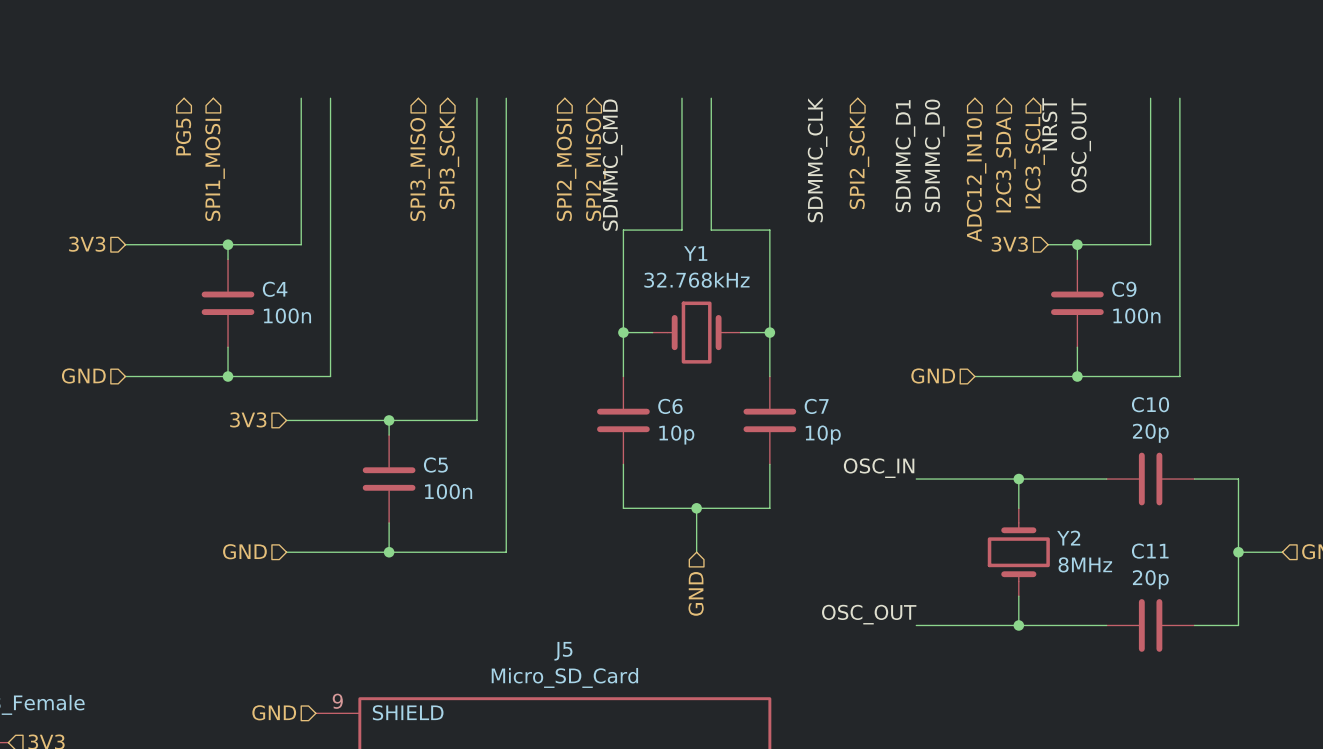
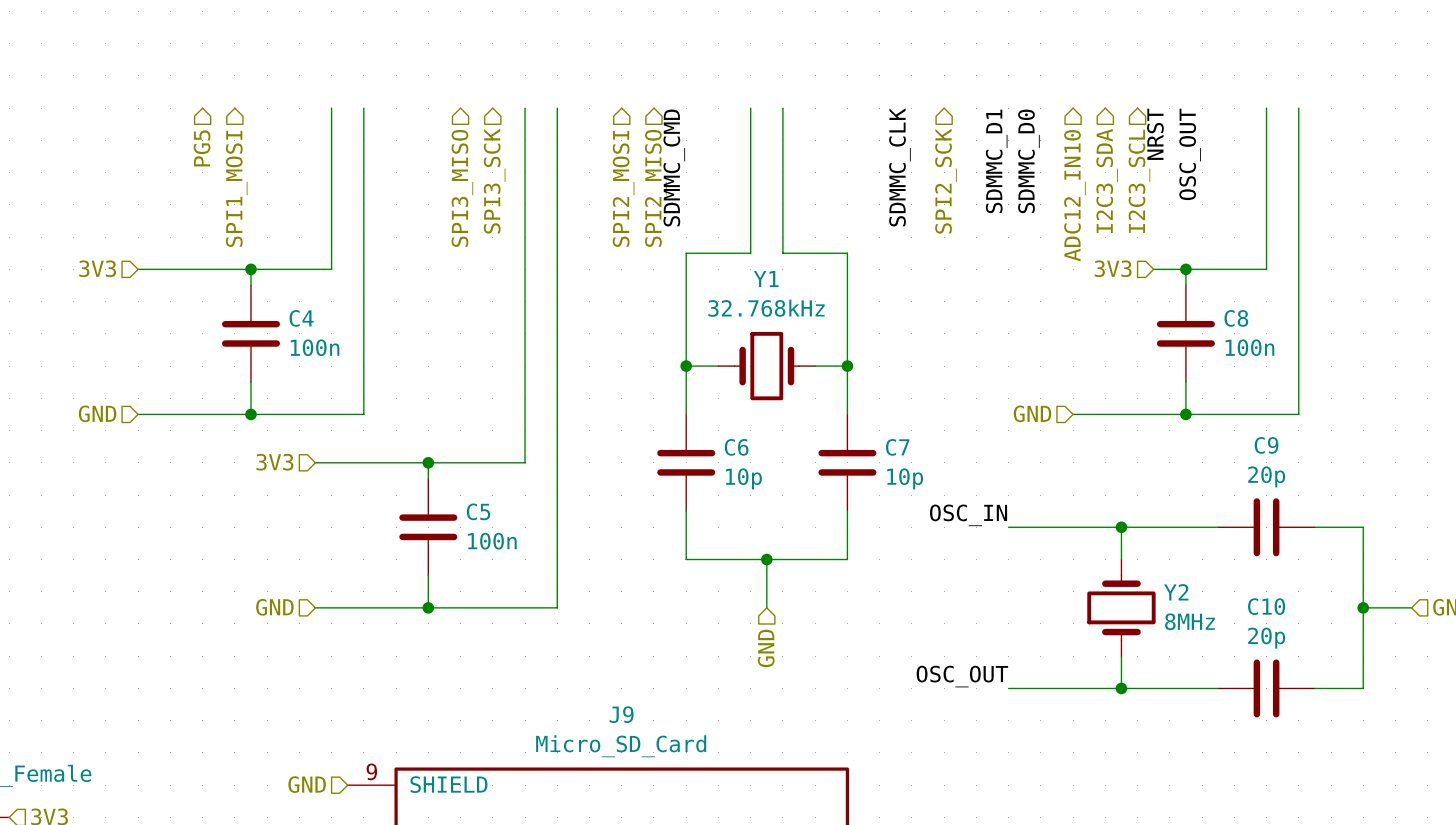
C9 name: C9 (1124, 289) -> C8 (1236, 318)
C10 name: C10 (1150, 404) -> C9 (1266, 445)
C11 name: C11 (1150, 551) -> C10 (1266, 606)
J5 name: J5 (563, 651) -> J9 (621, 714)

